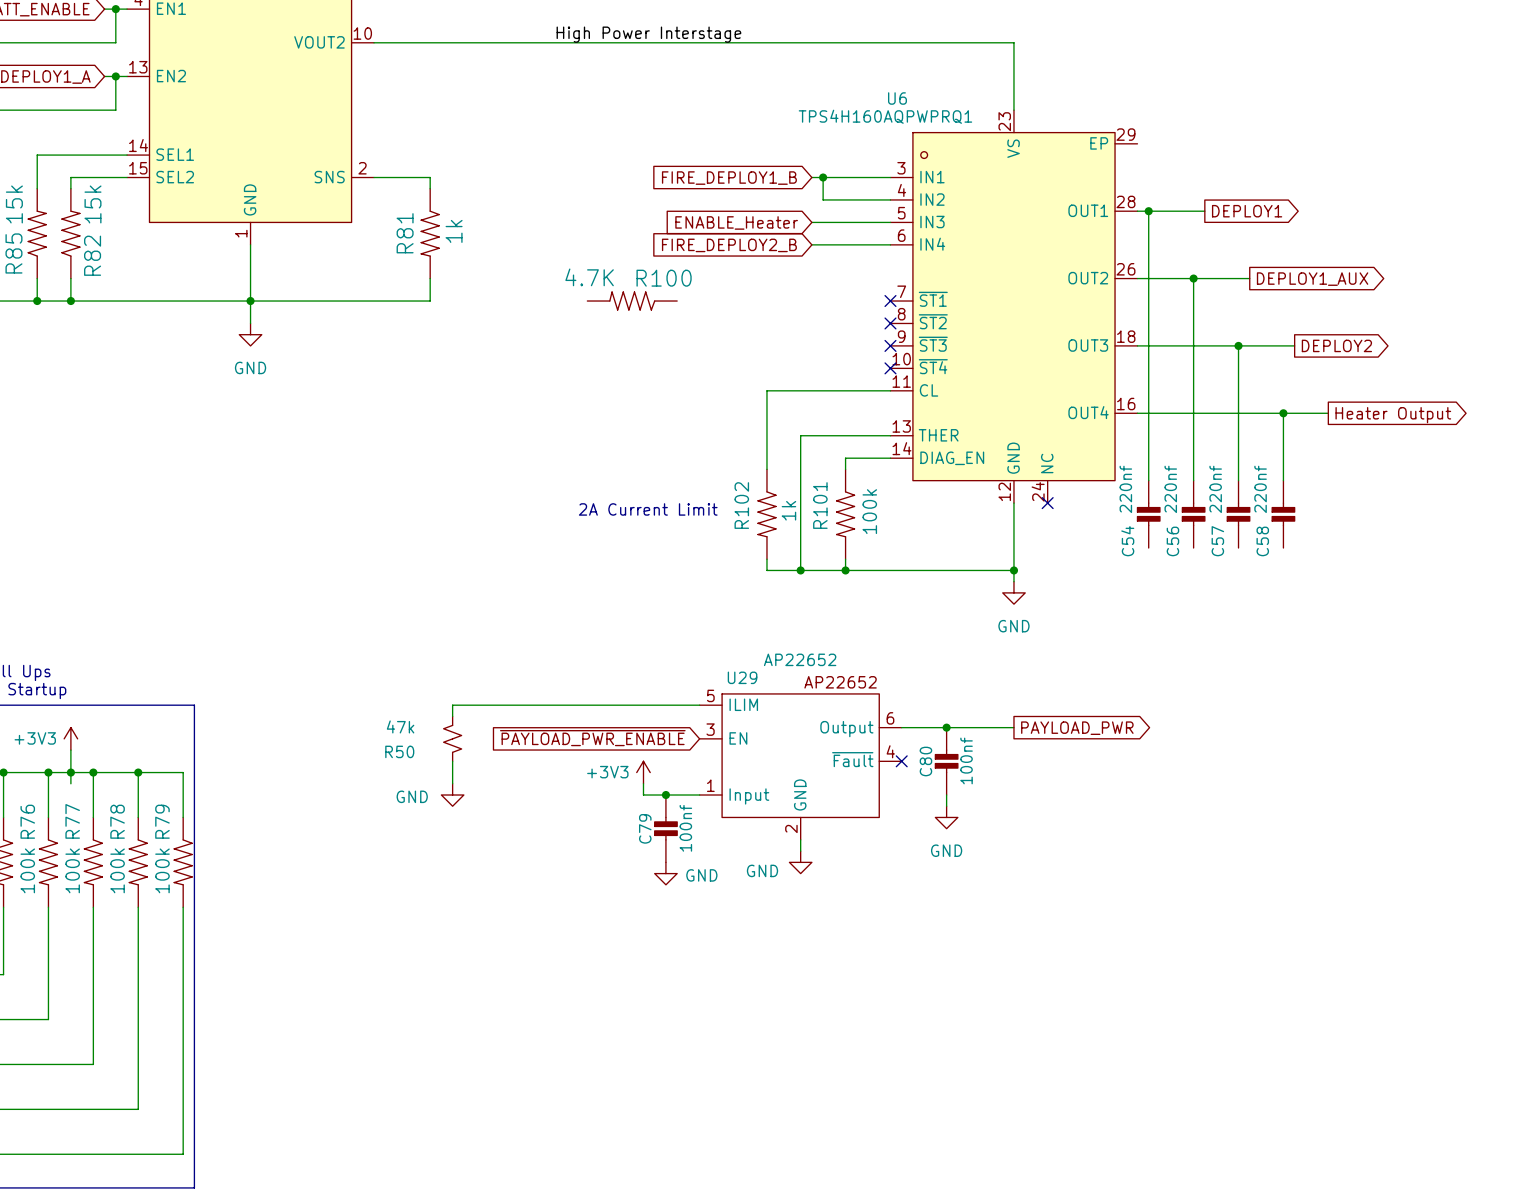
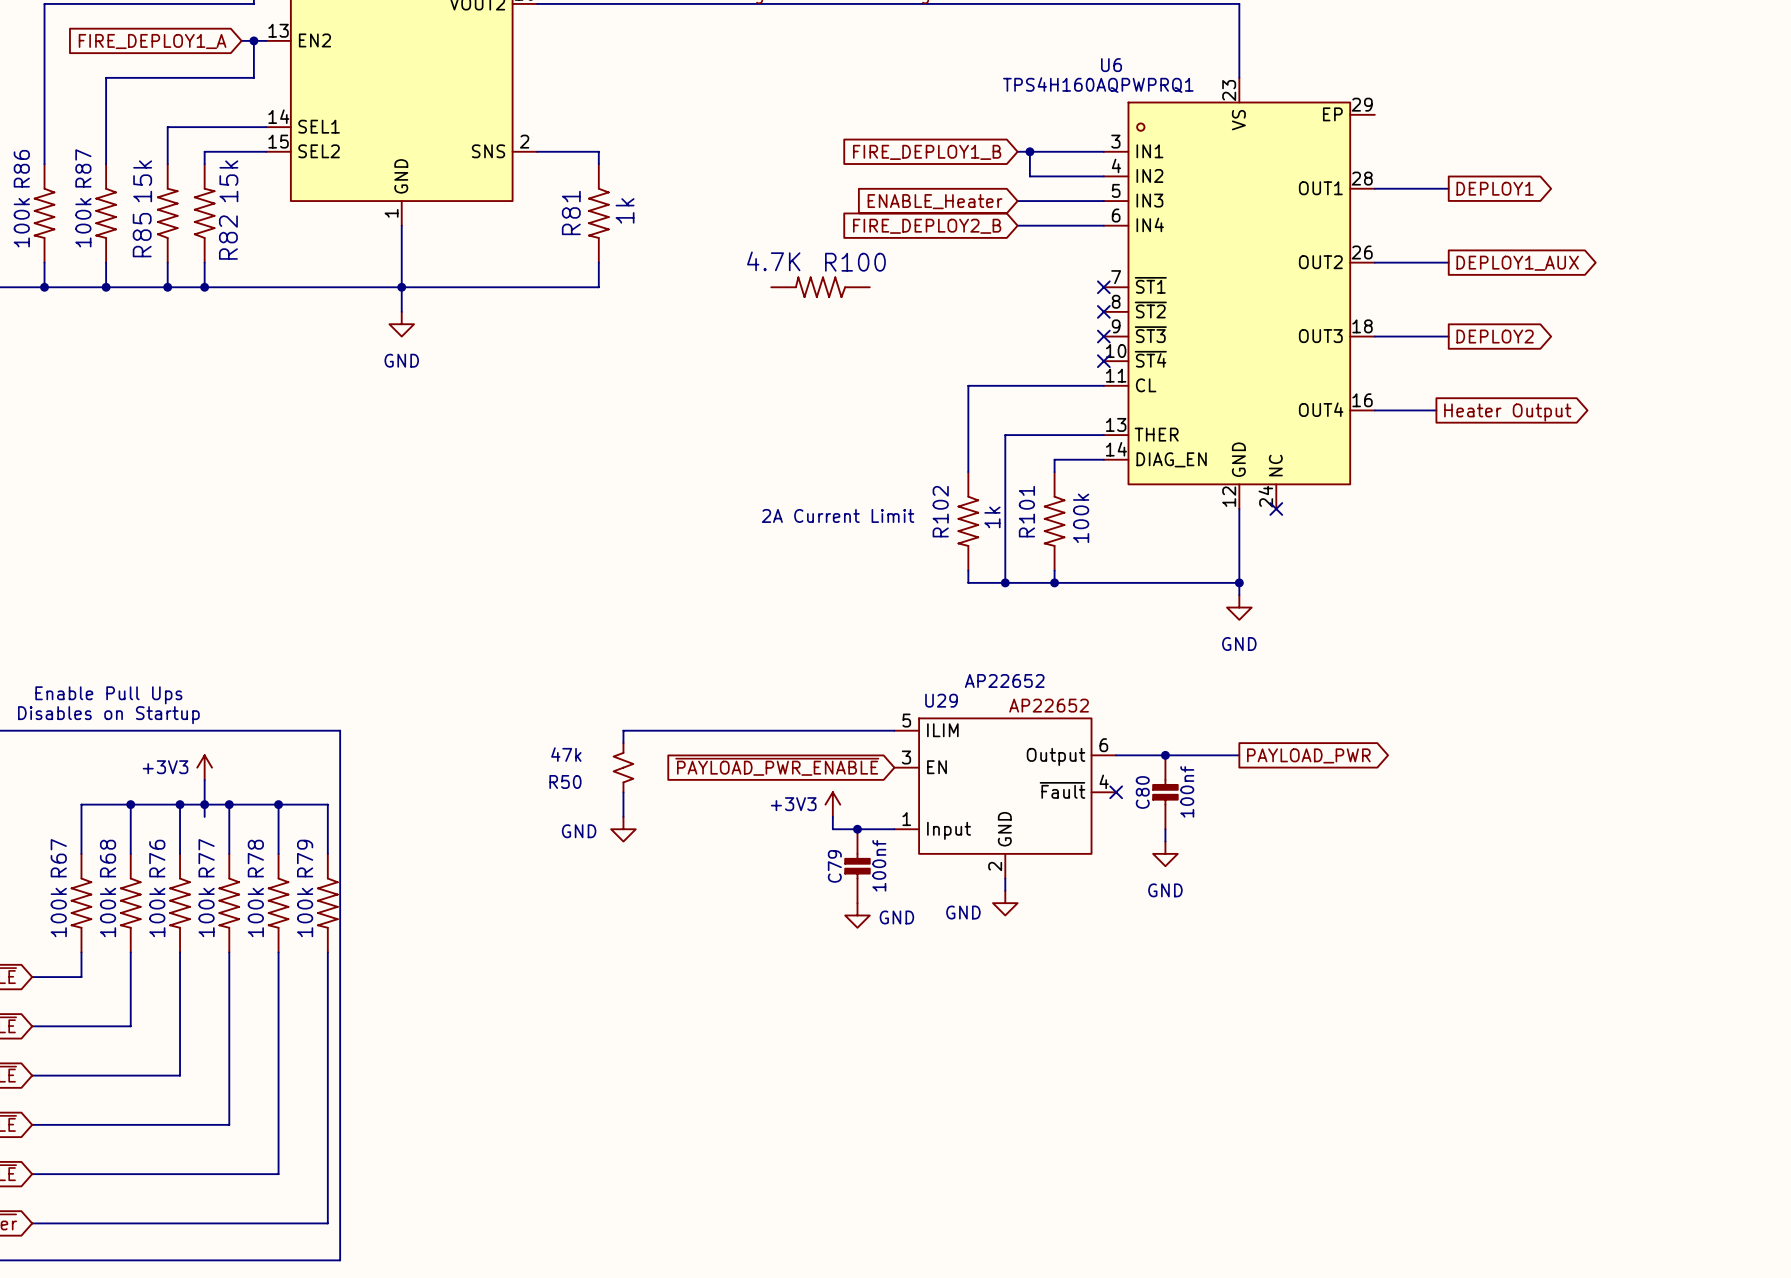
wire: (1148, 211) (1148, 480) -> none
junction: (1148, 211) -> none
wire: (1193, 278) (1193, 480) -> none
junction: (1193, 278) -> none
wire: (1204, 278) (1249, 278) -> none
global label position: DEPLOY1_AUX (1312, 279) -> DEPLOY1_AUX (1517, 263)
wire: (1204, 345) (1294, 345) -> none
wire: (1238, 345) (1238, 480) -> none
junction: (1238, 345) -> none
global label position: DEPLOY2 (1336, 345) -> DEPLOY2 (1495, 336)
wire: (1193, 413) (1328, 413) -> none
wire: (1283, 413) (1283, 480) -> none
junction: (1283, 413) -> none
global label position: Heater Output (1393, 415) -> Heater Output (1507, 412)
C54: 220nf (1148, 514) -> none
C56: 220nf (1193, 514) -> none
C57: 220nf (1238, 514) -> none
C58: 220nf (1283, 514) -> none

